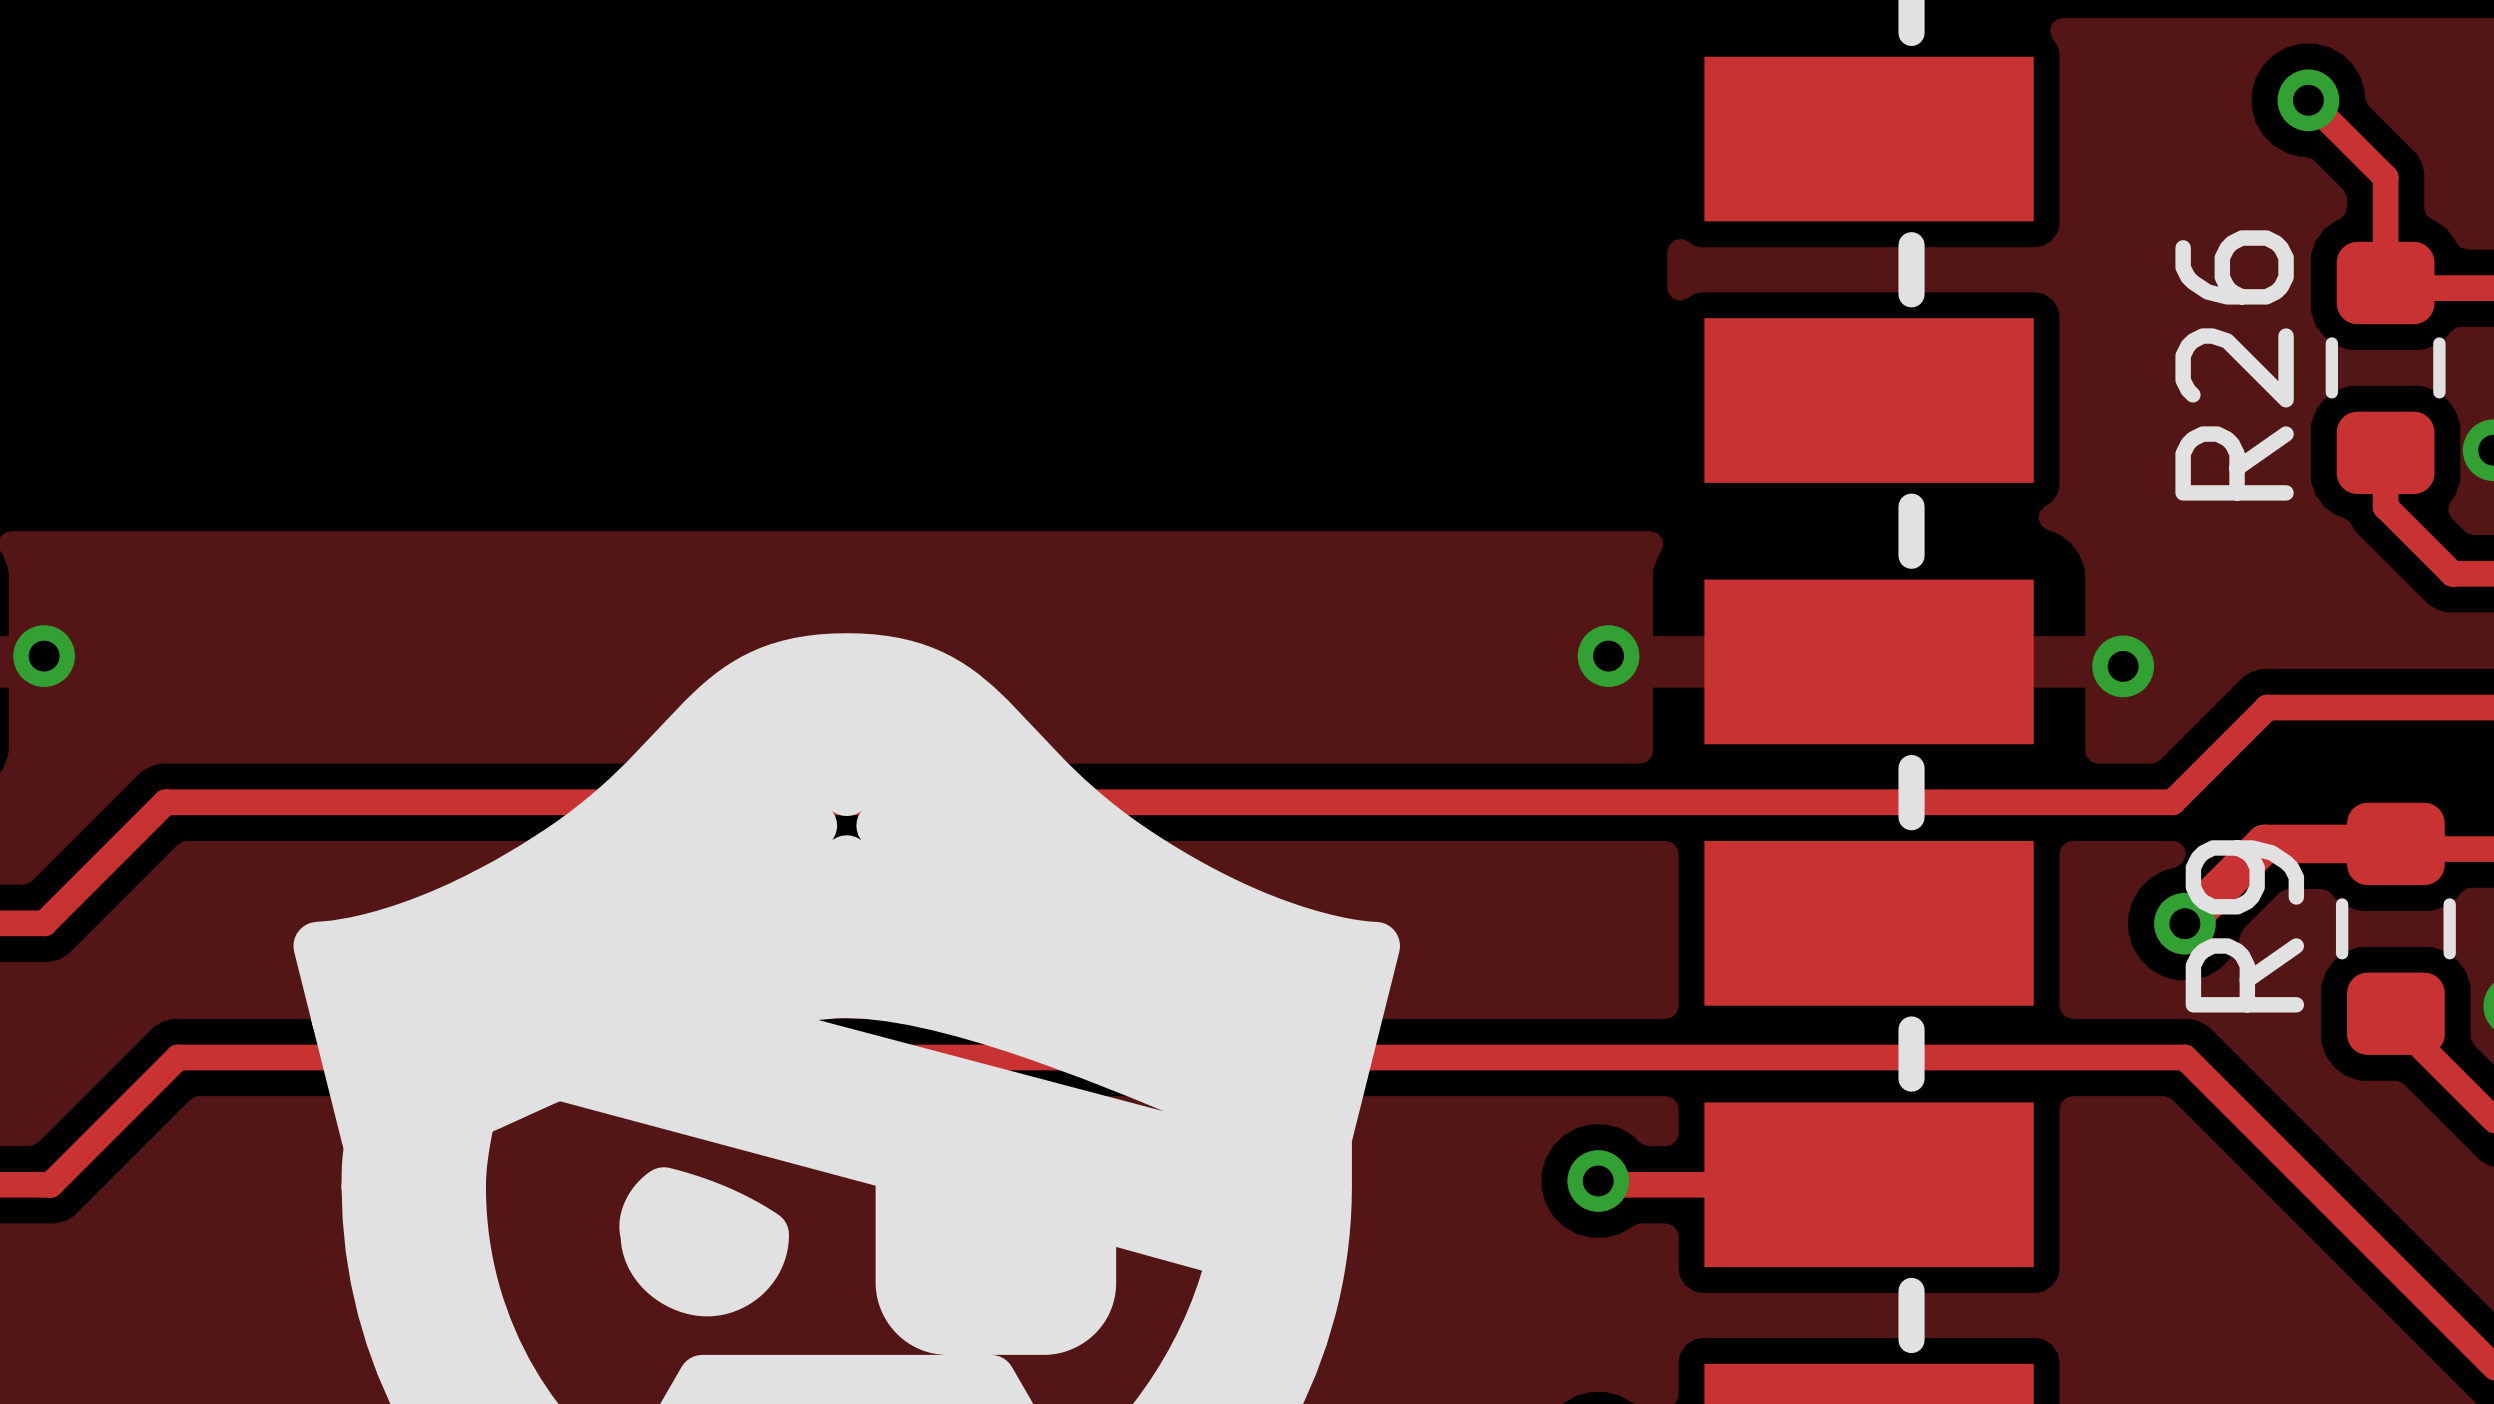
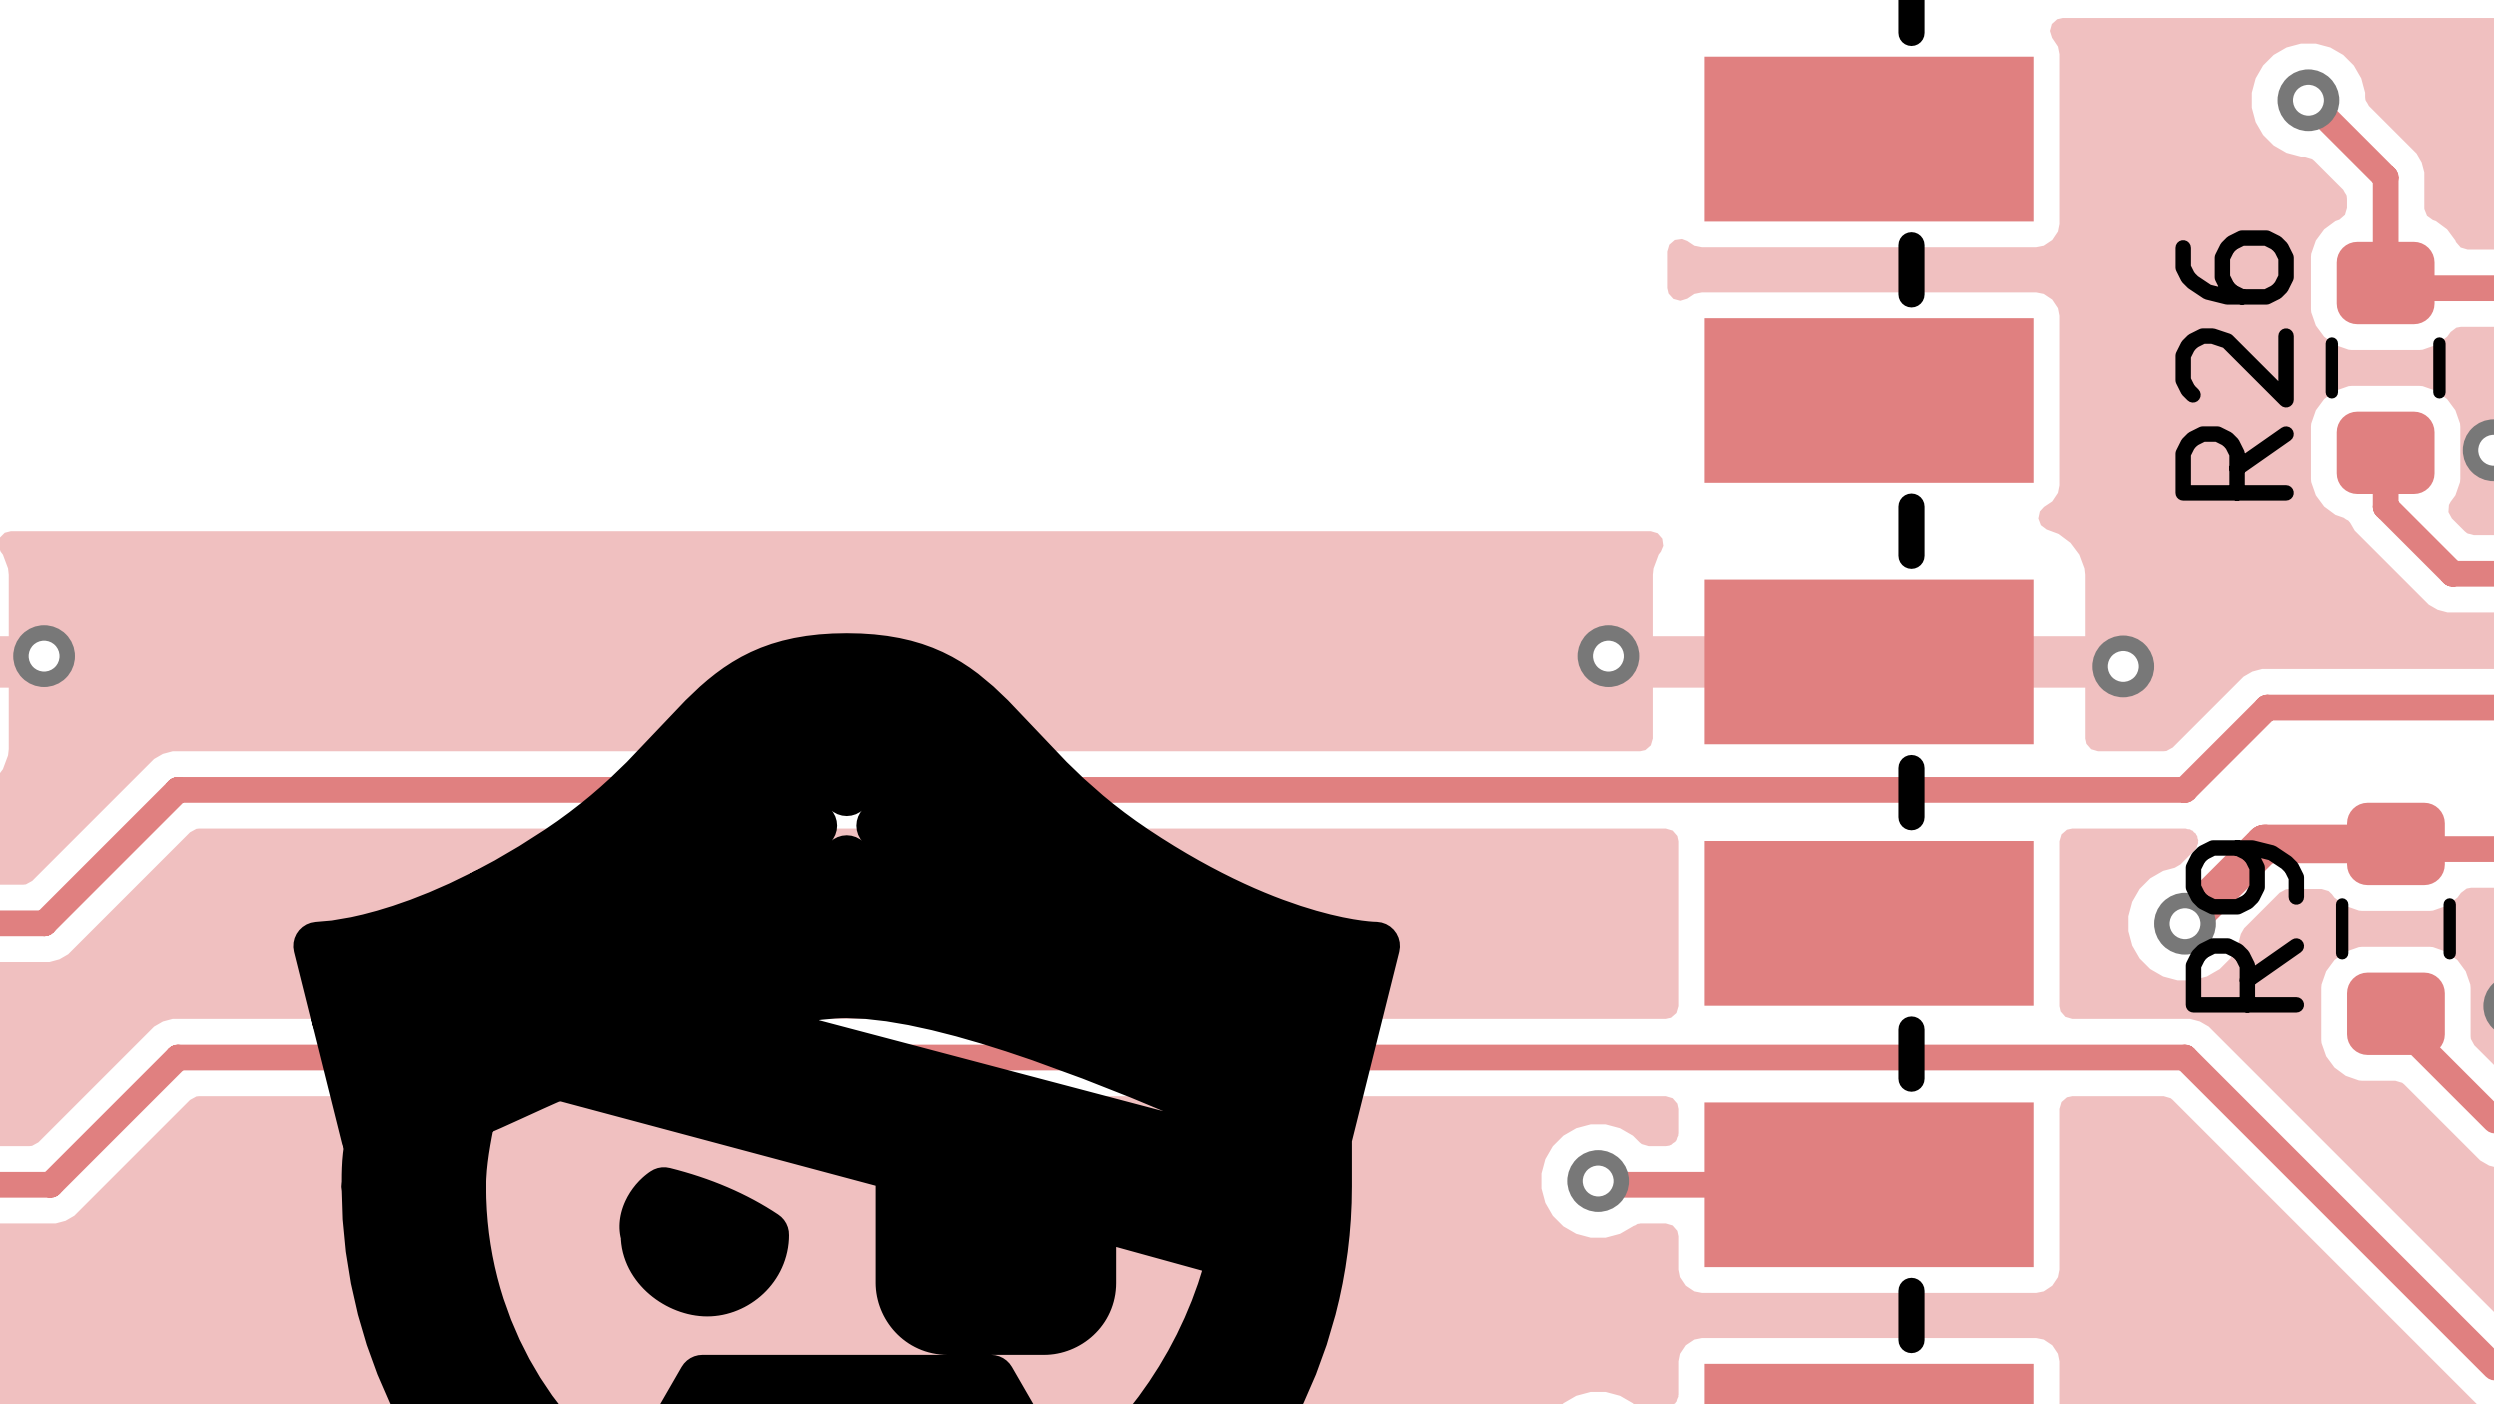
track: (2184, 789) (2172, 802) (165, 802) -> (2184, 789) (177, 789) (165, 802)

